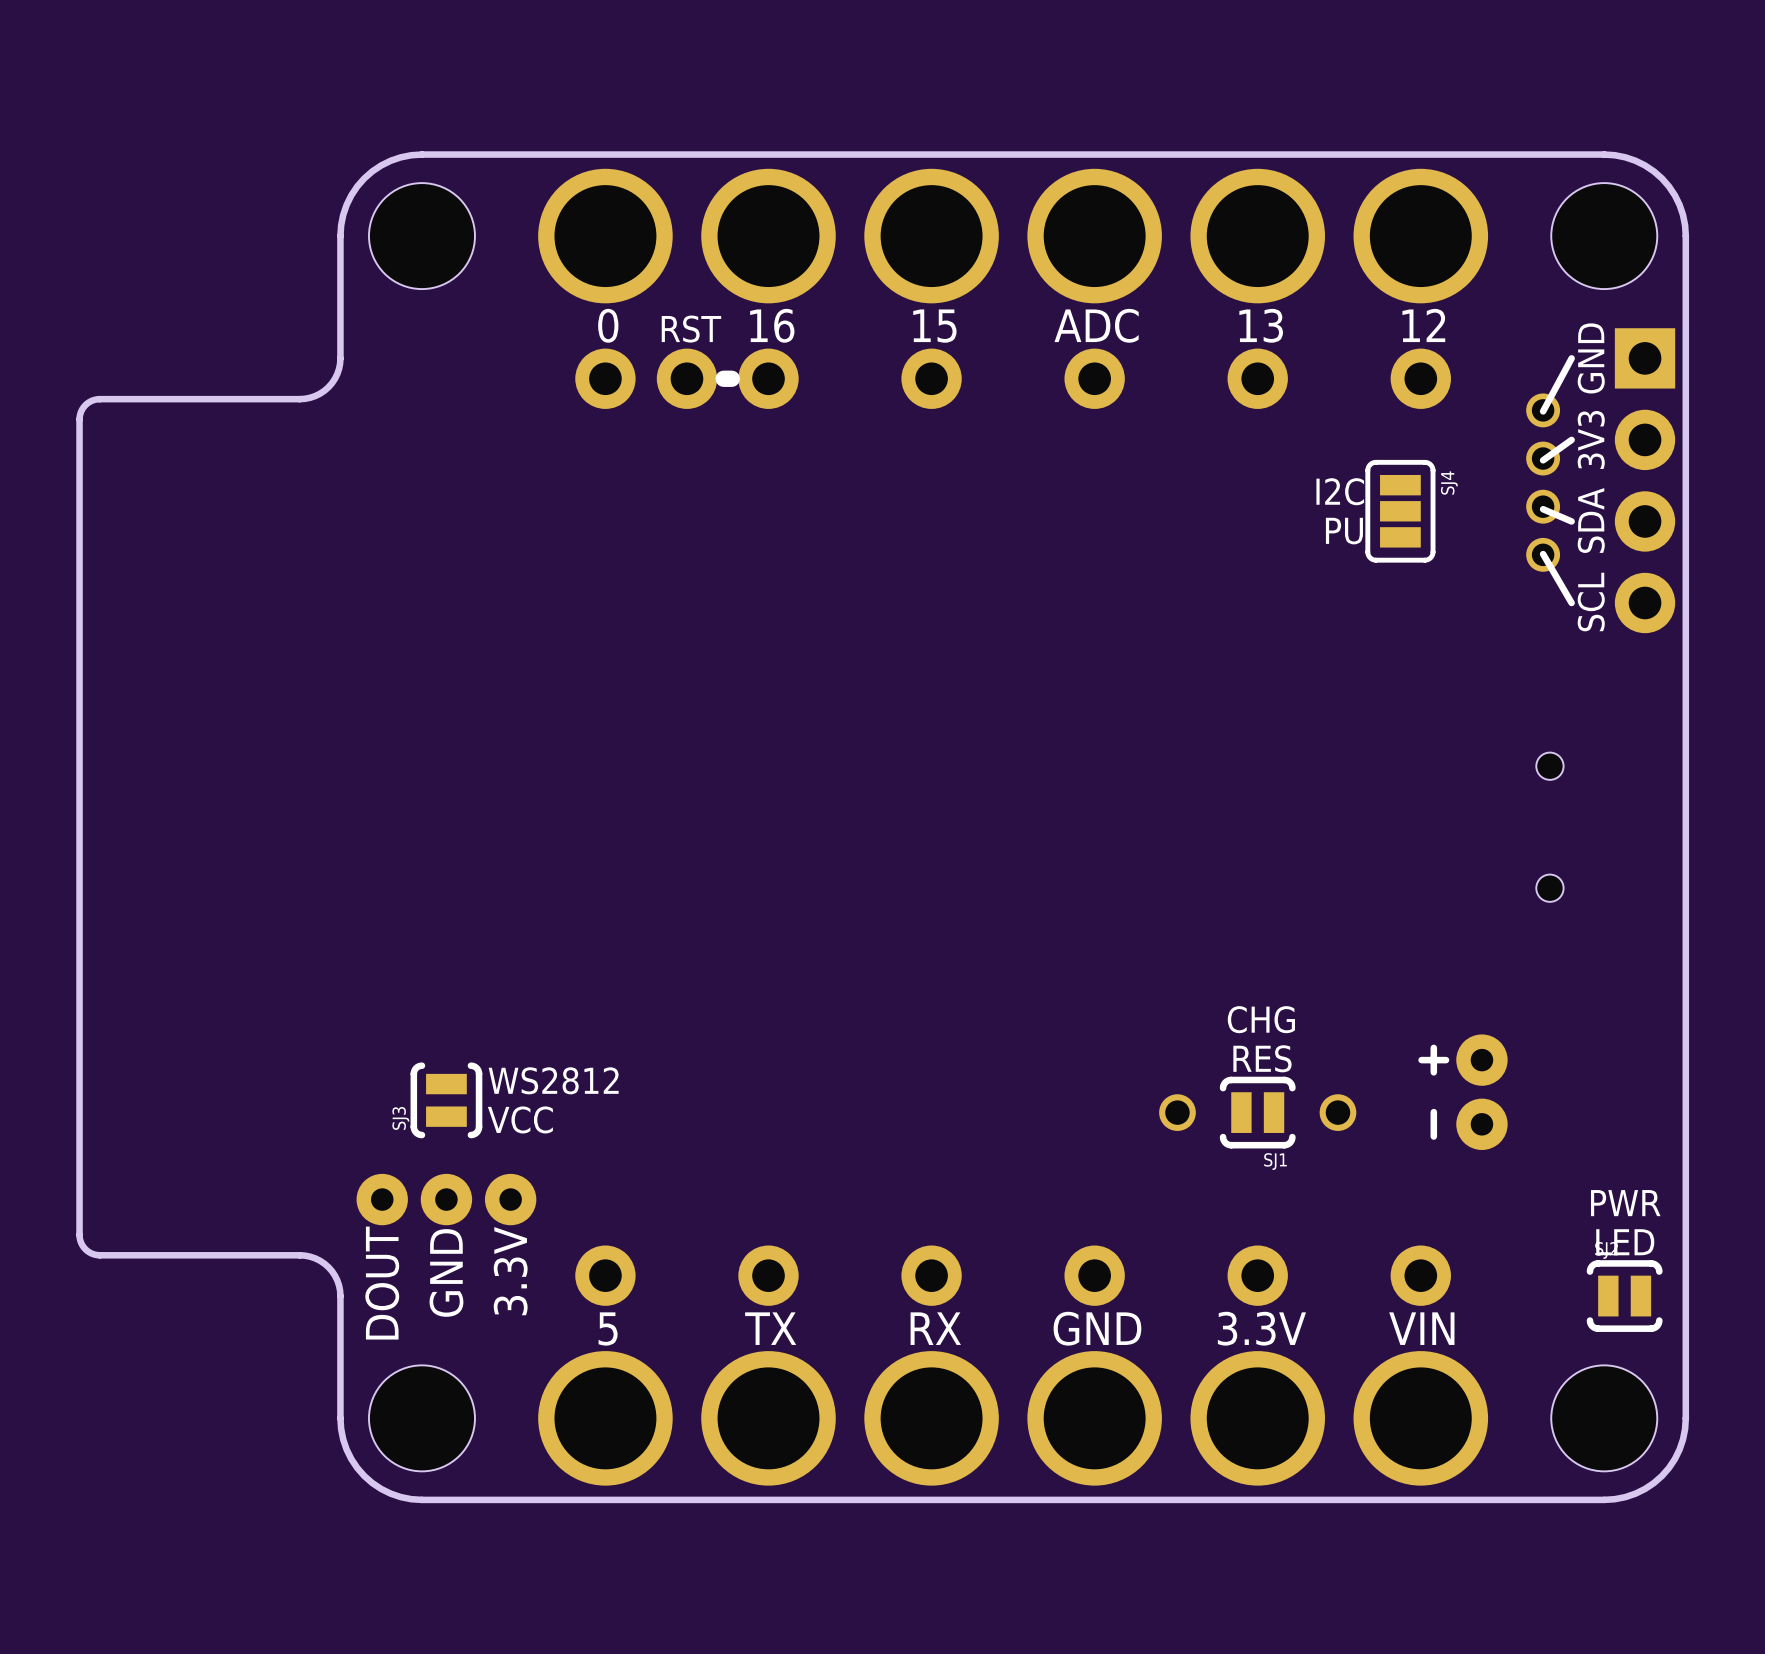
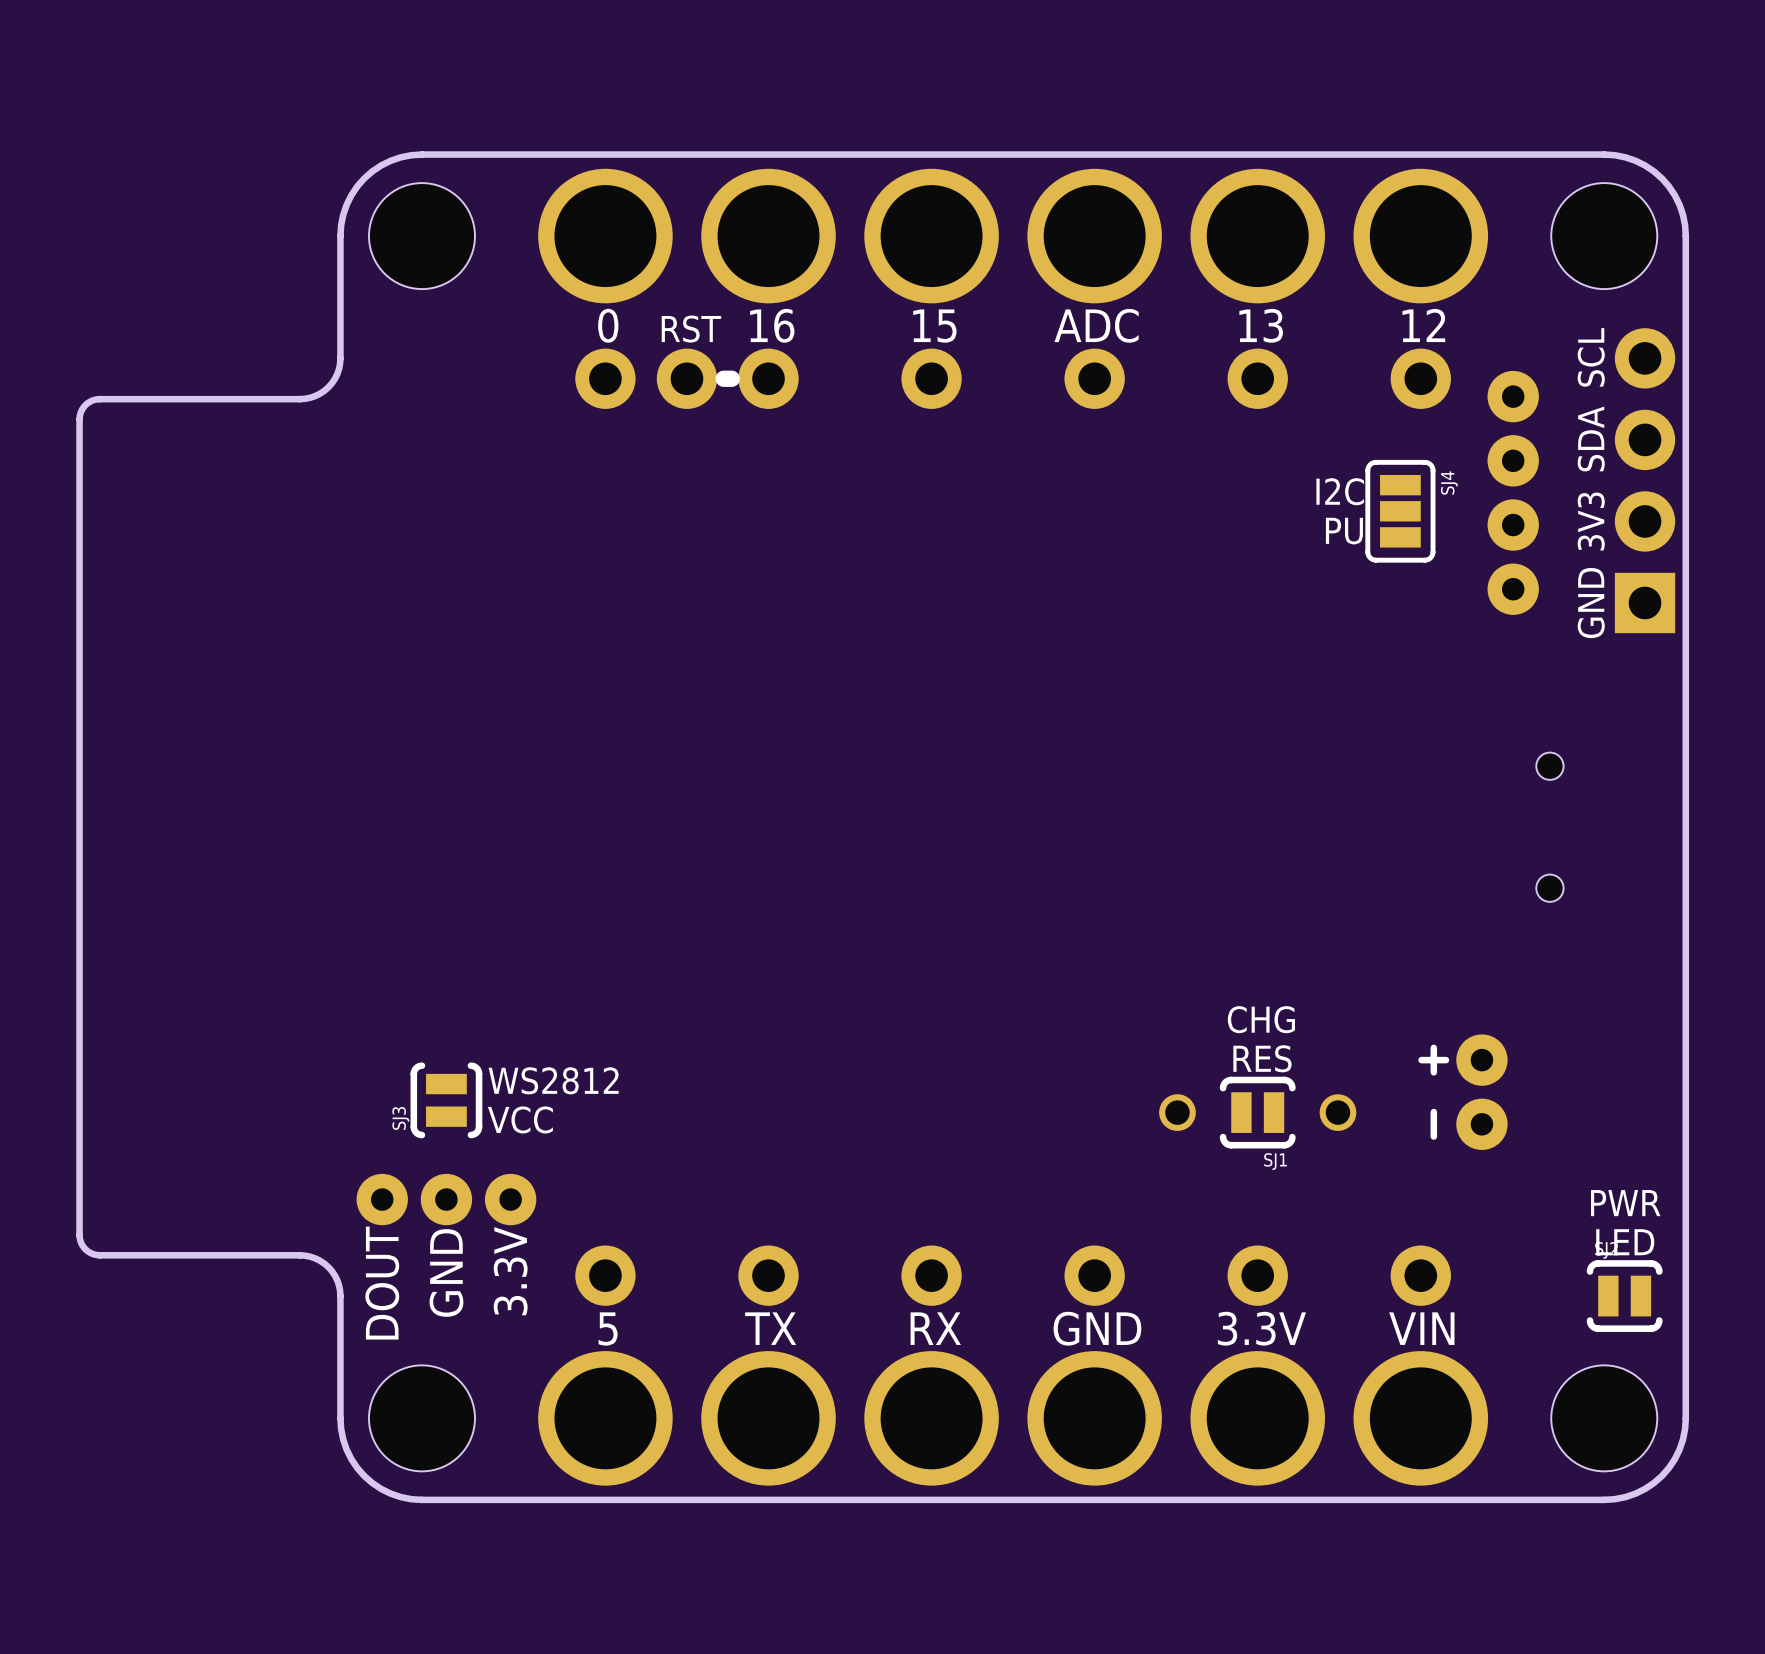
line: (1571, 358) (1543, 411) -> none
text: GND (1591, 358) -> SCL (1591, 357)
part footprint: [1526, 393, 1561, 572] -> [1487, 370, 1539, 615]
line: (1571, 439) (1543, 460) -> none
text: 3V3 (1591, 439) -> SDA (1591, 438)
part rotation: 0° (1645, 480) -> 180° (1645, 480)
line: (1543, 509) (1571, 521) -> none
text: SDA (1591, 520) -> 3V3 (1591, 521)
line: (1543, 554) (1571, 602) -> none
text: SCL (1591, 602) -> GND (1591, 603)

